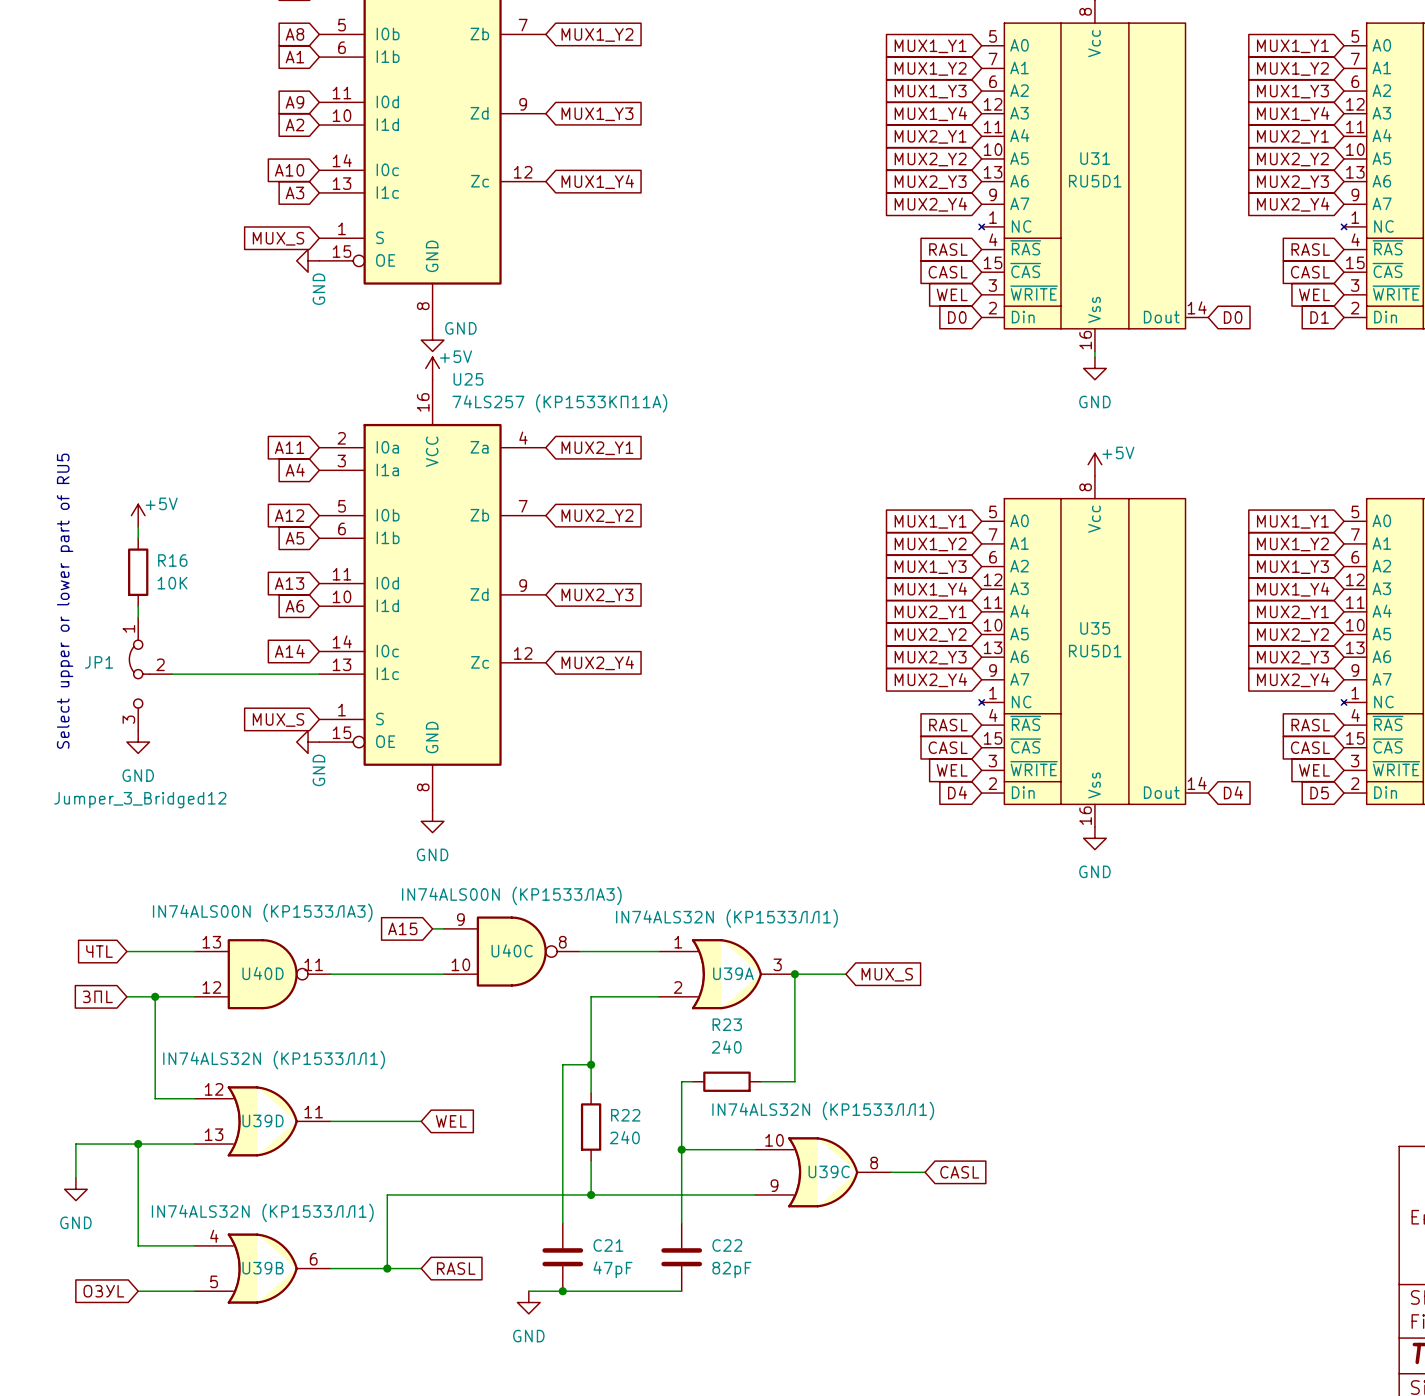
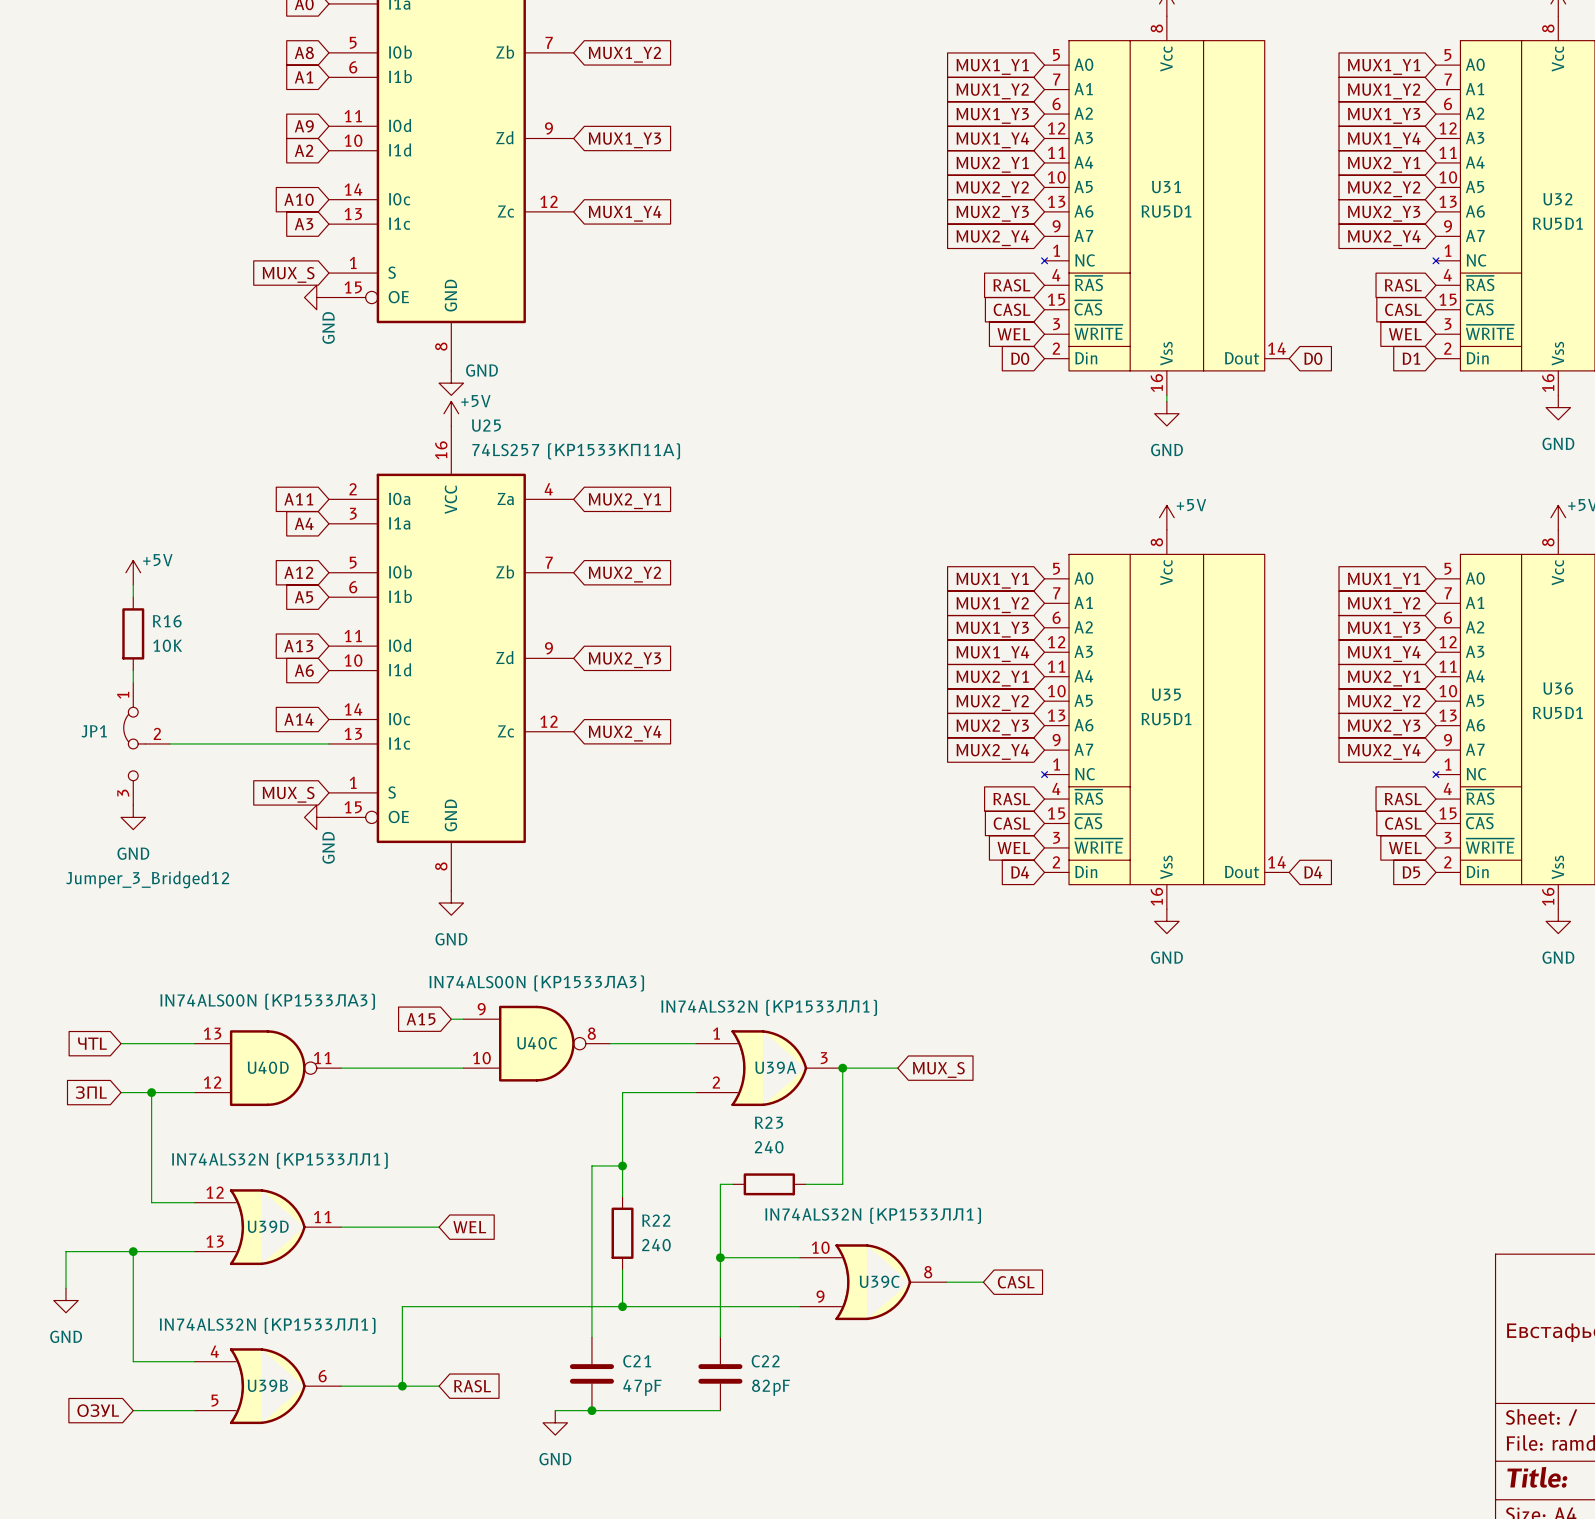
text: Select upper or lower part of RU5 (65, 601) -> none

